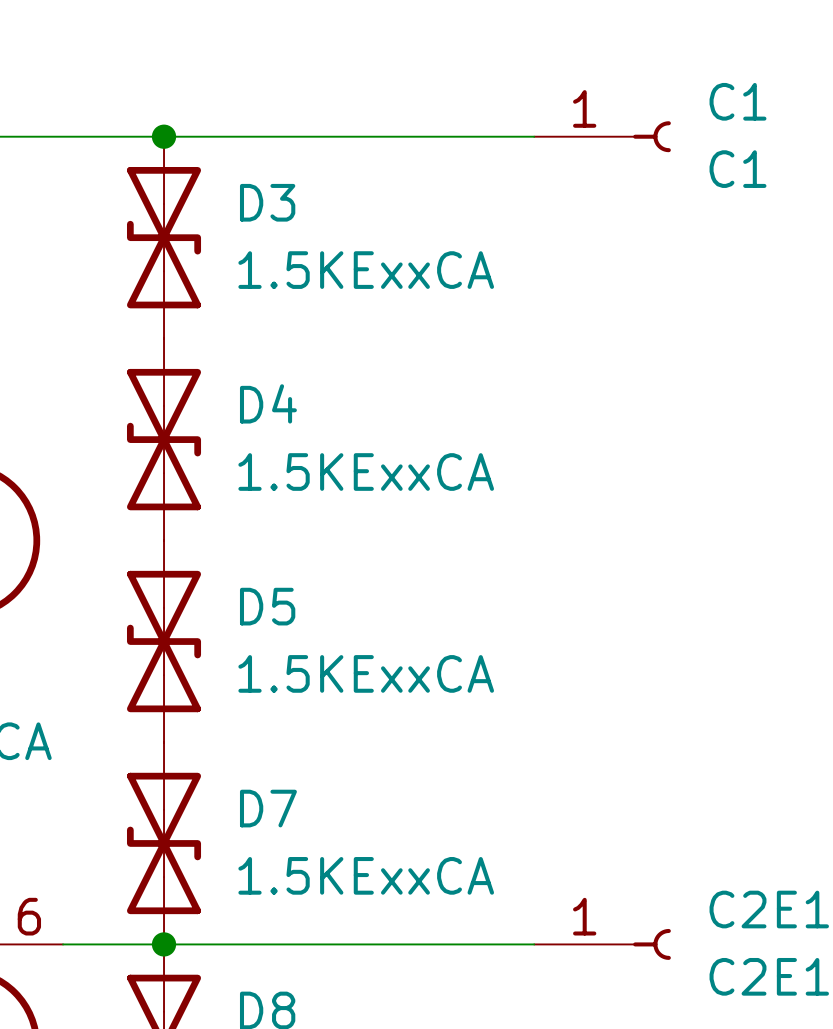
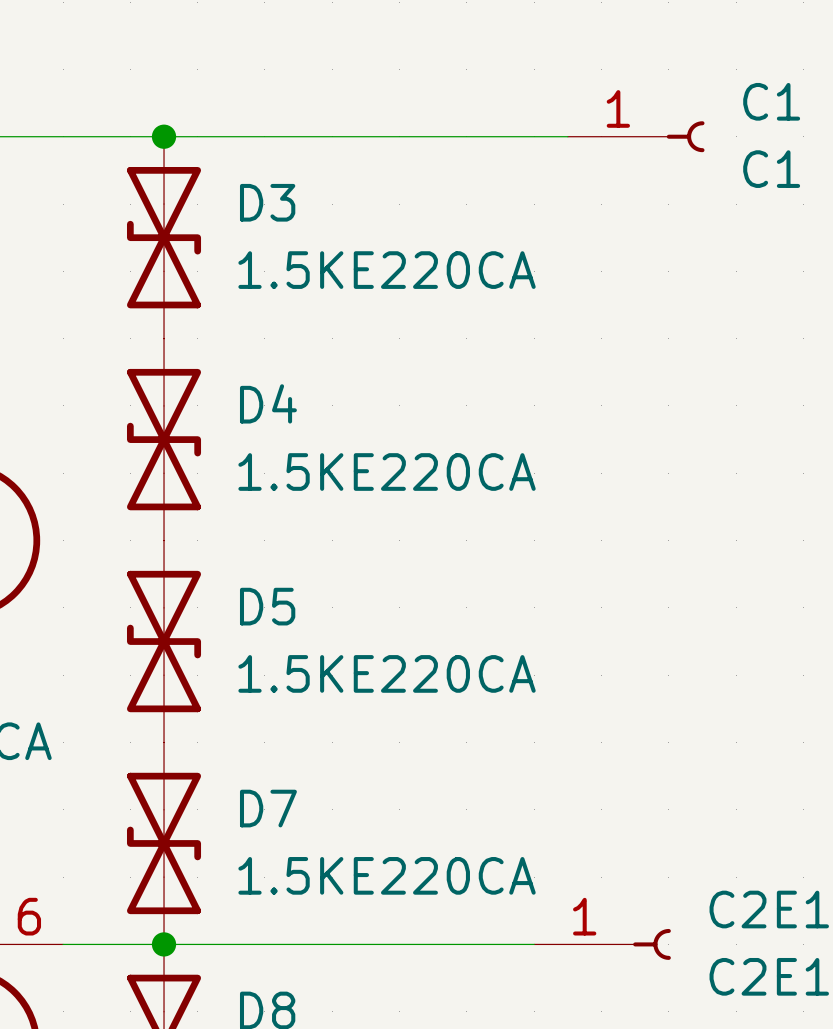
C1 position: (602, 136) -> (636, 136)
D3 value: 1.5KExxCA (366, 270) -> 1.5KE220CA (387, 270)
D4 value: 1.5KExxCA (366, 472) -> 1.5KE220CA (387, 472)
D5 value: 1.5KExxCA (366, 673) -> 1.5KE220CA (387, 673)
D7 value: 1.5KExxCA (366, 875) -> 1.5KE220CA (387, 875)

